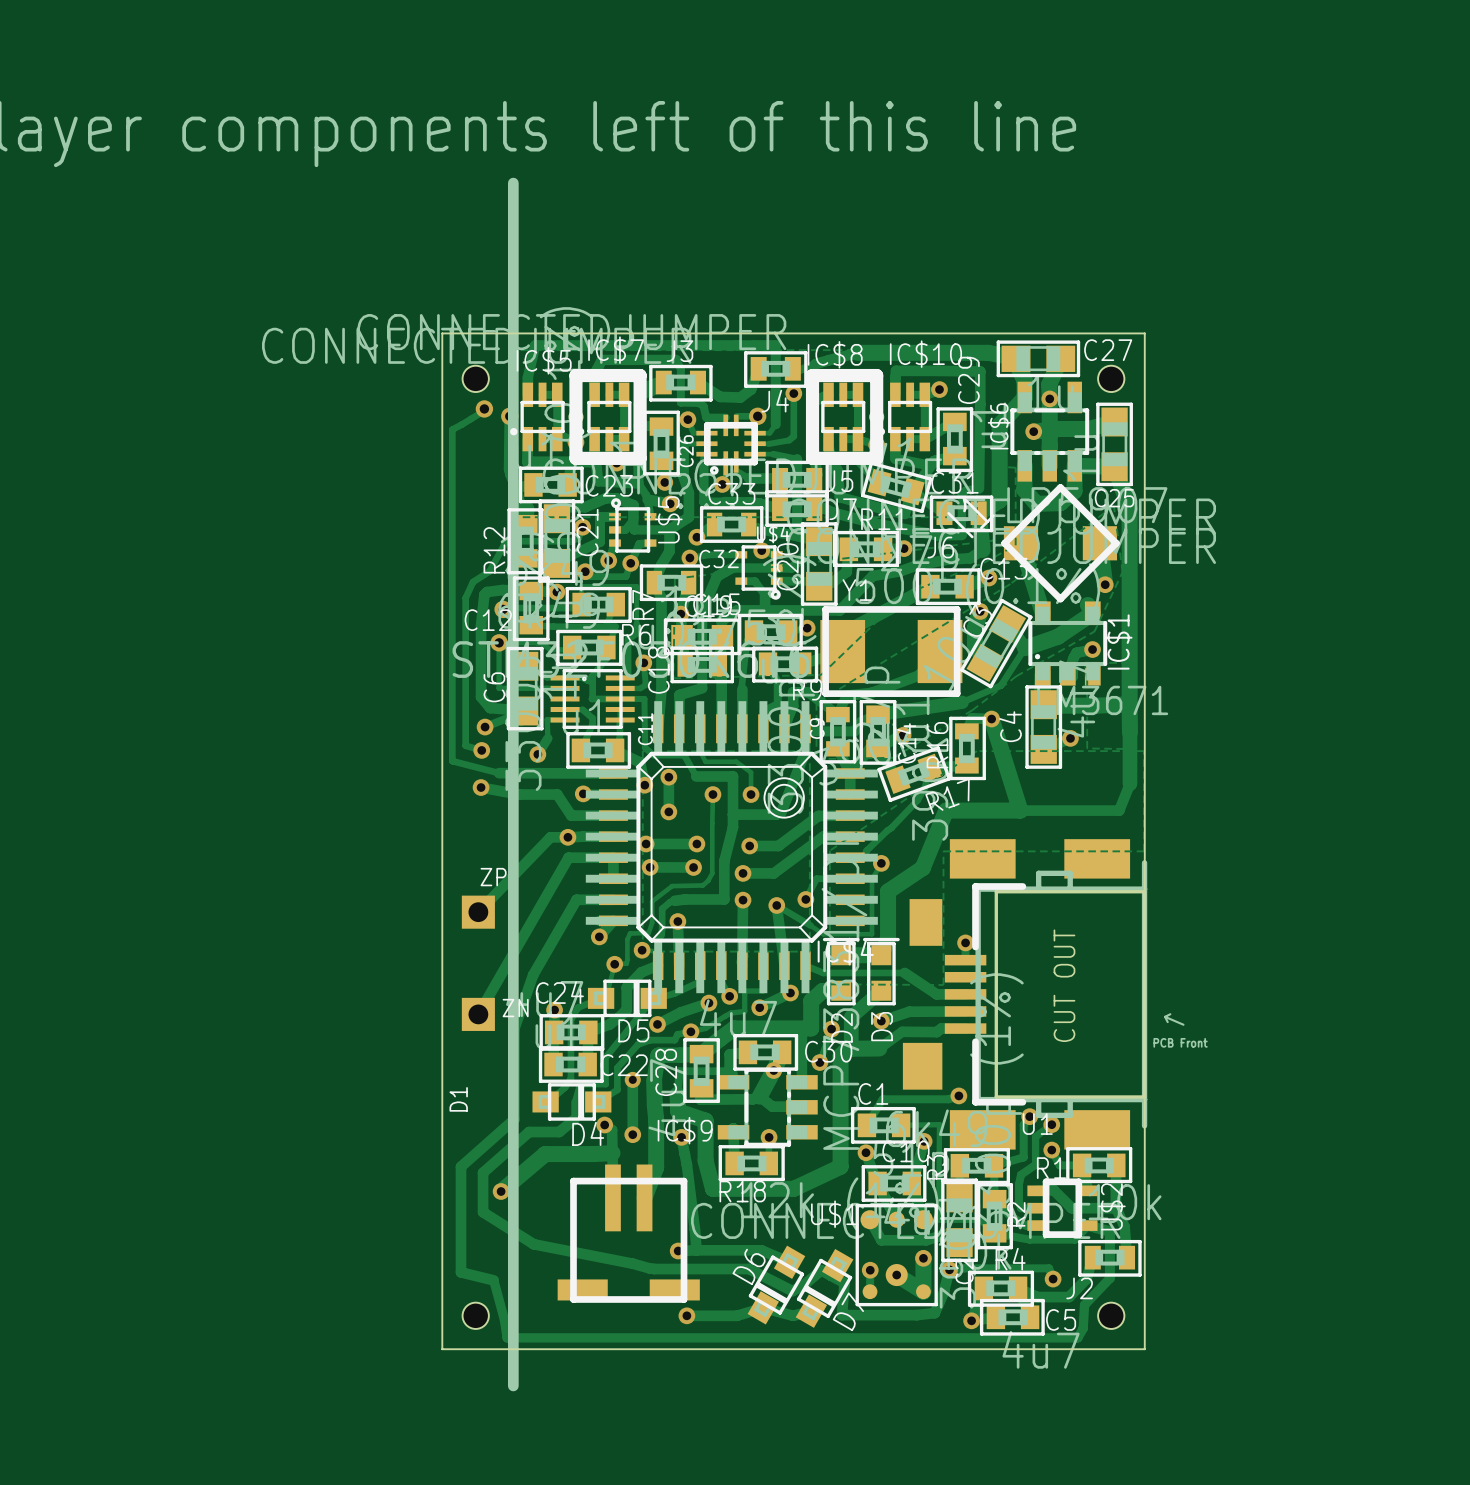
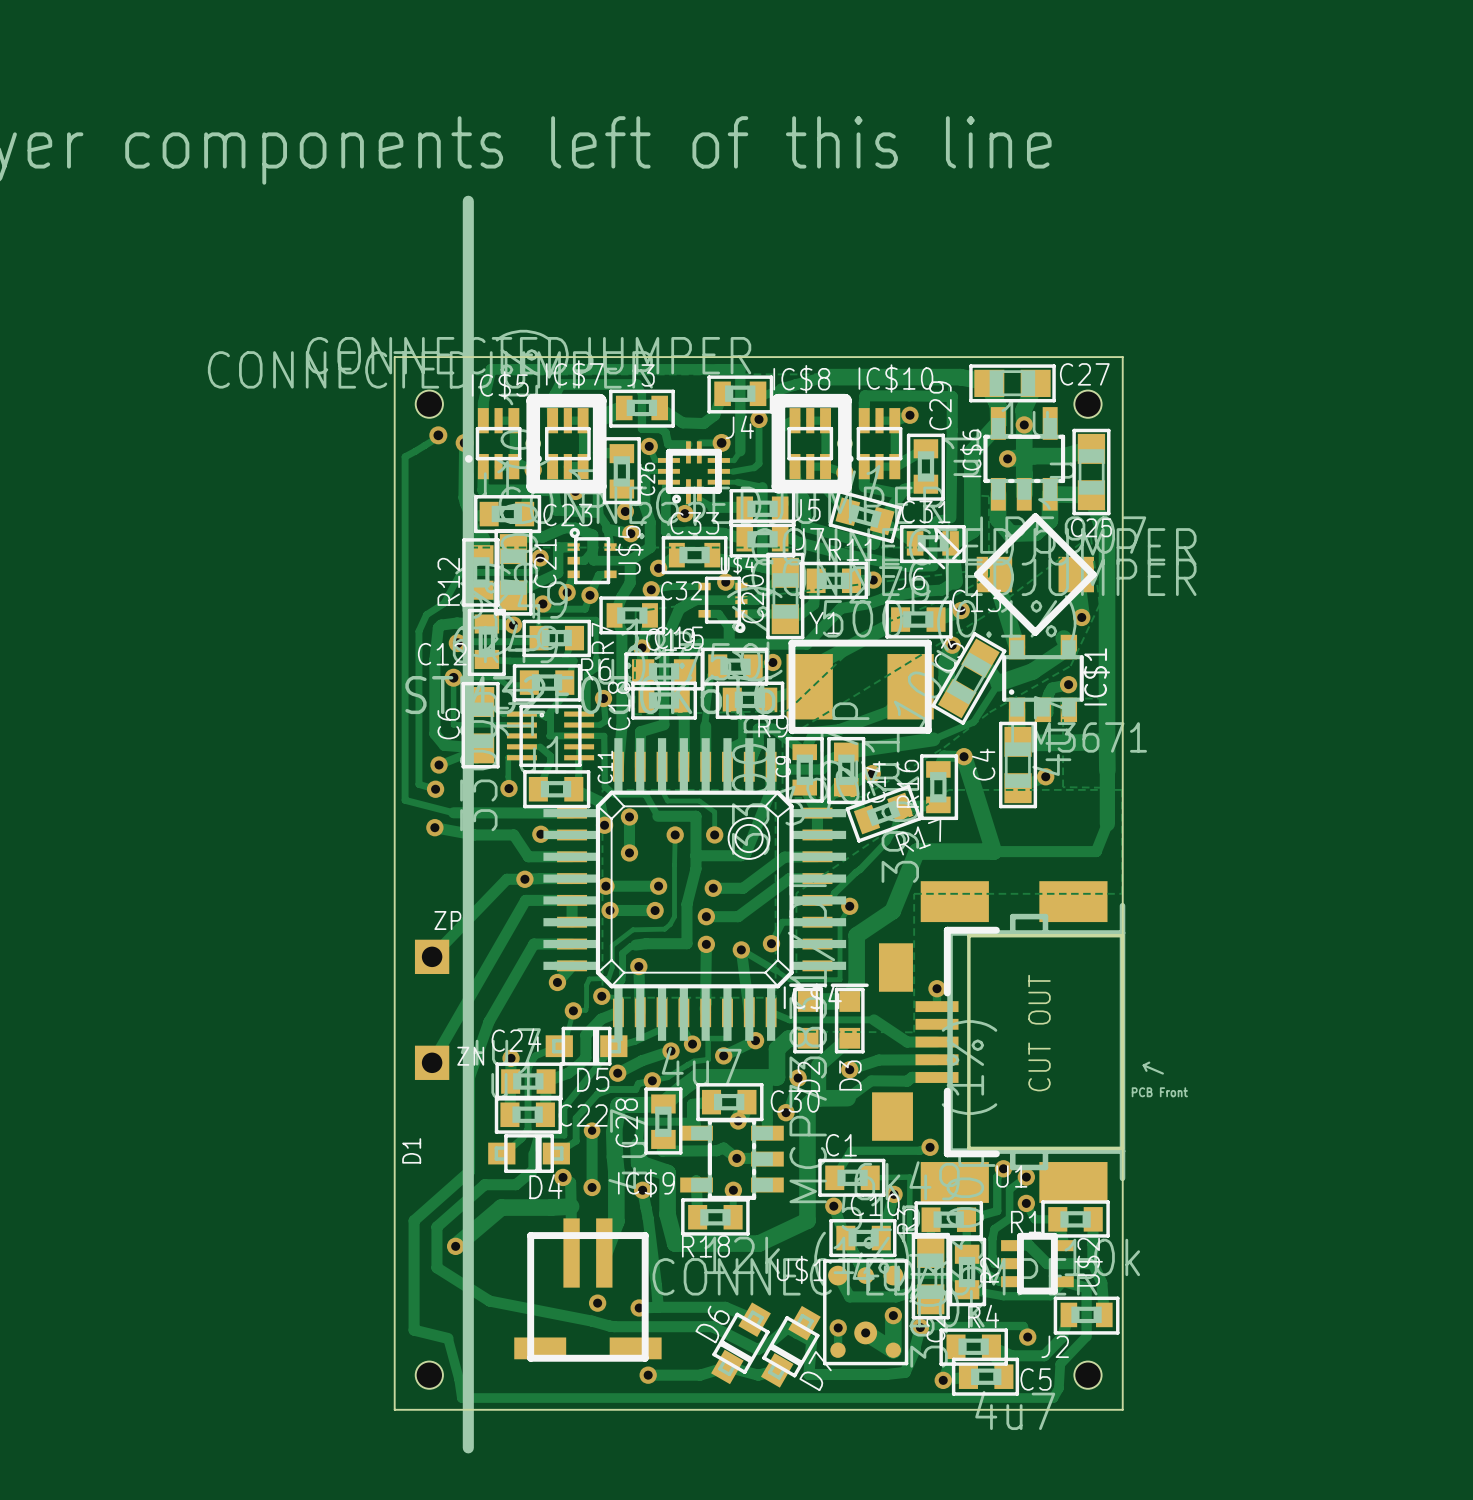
track: (565, 720) (547, 719) (547, 738) (537, 754) -> (521, 757) (508, 757) (508, 788)
via position: (537, 754) -> (508, 788)
track: (773, 1070) (759, 1096) -> none
via: none -> (736, 1158)
via: none -> (597, 1303)

